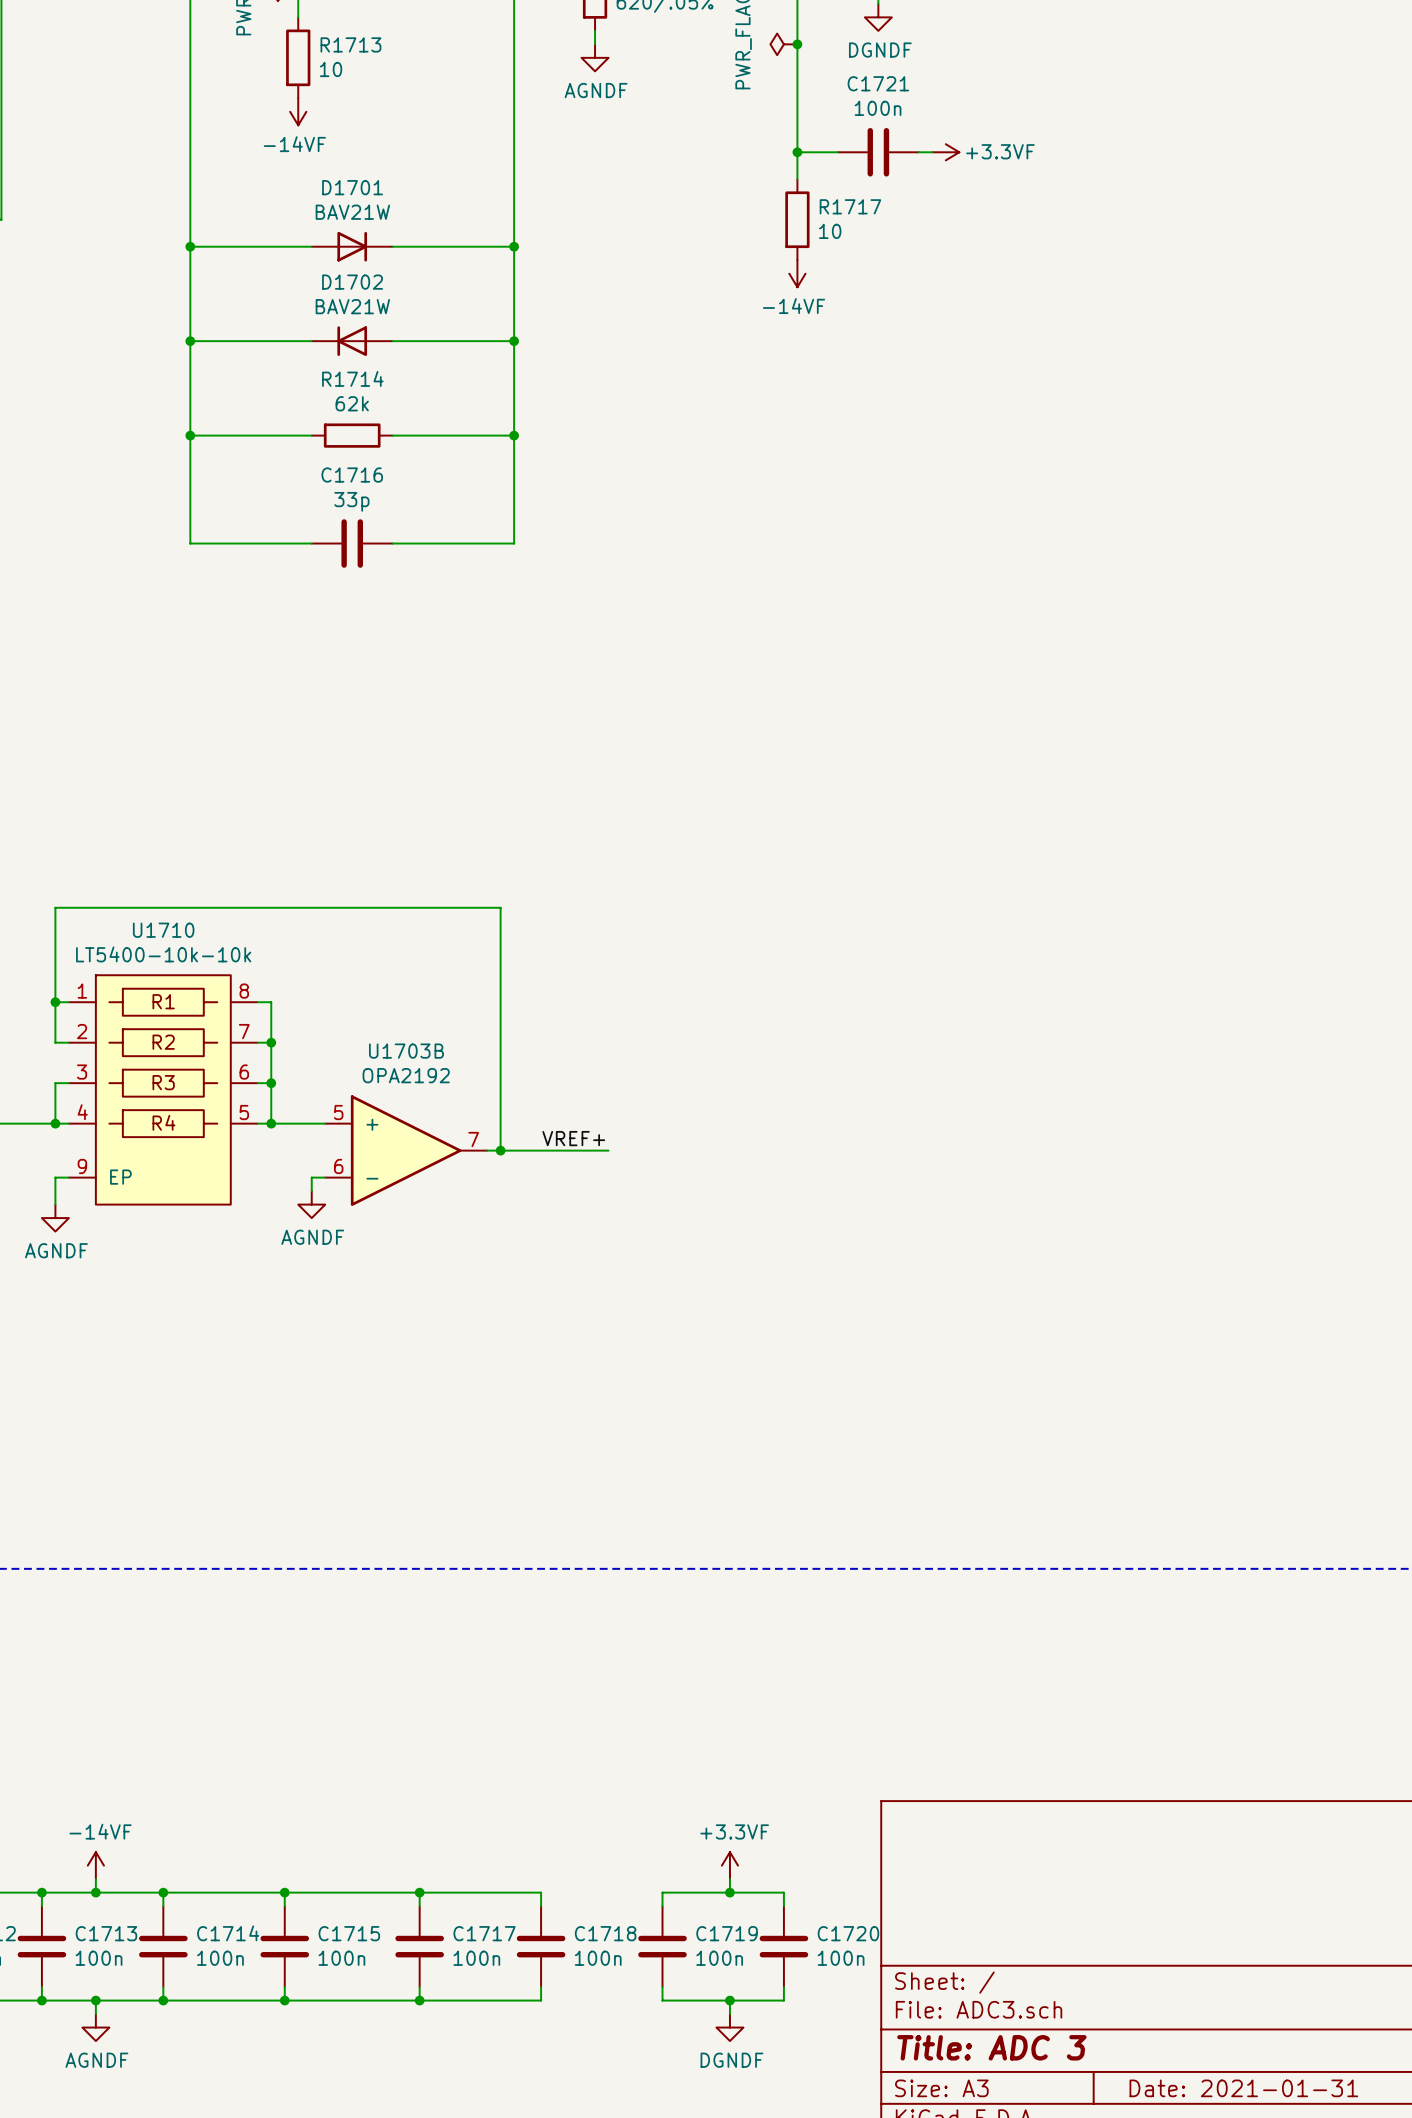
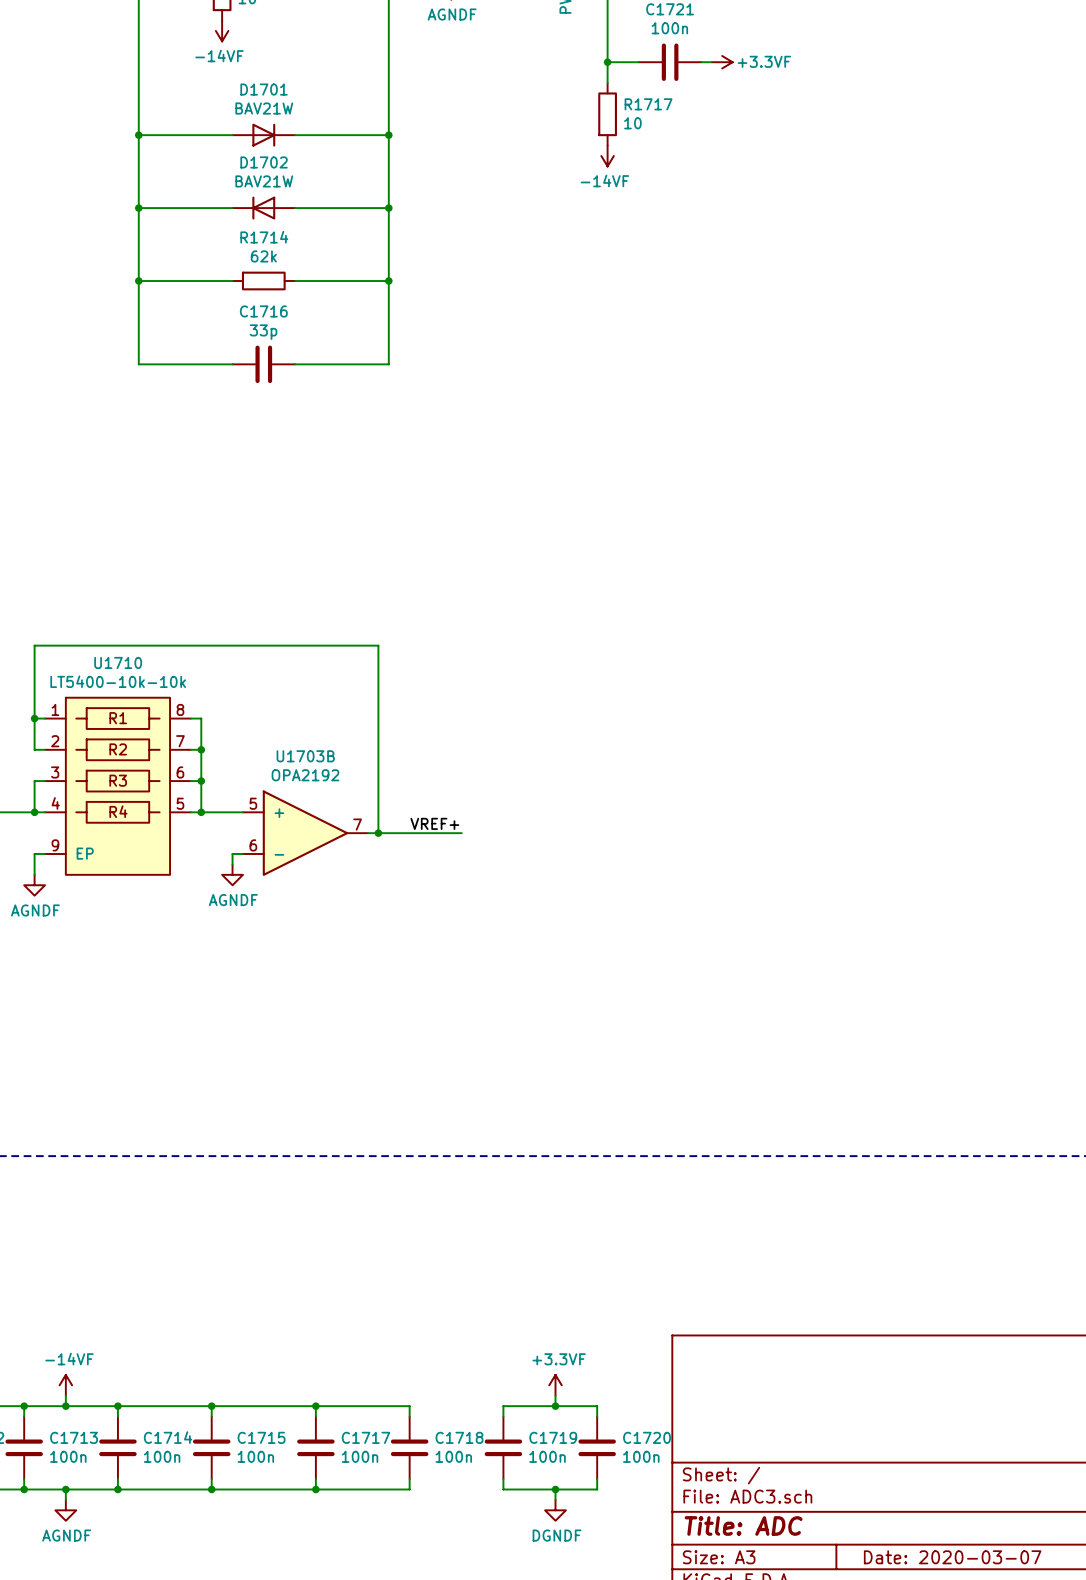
title block: Title: ADC 3 (991, 2047) -> Title: ADC (743, 1525)
title block: Date: 2021-01-31 (1243, 2088) -> Date: 2020-03-07 (952, 1557)

